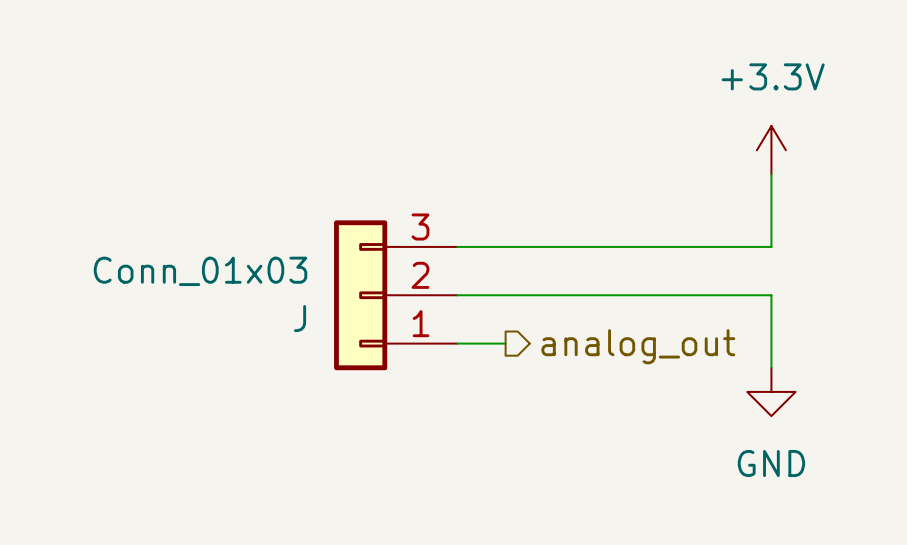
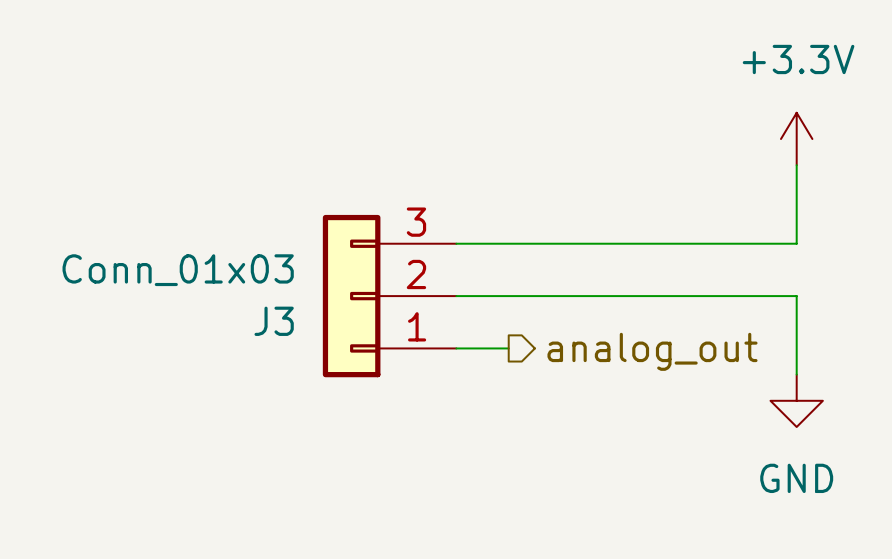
J name: J (300, 318) -> J3 (274, 321)

